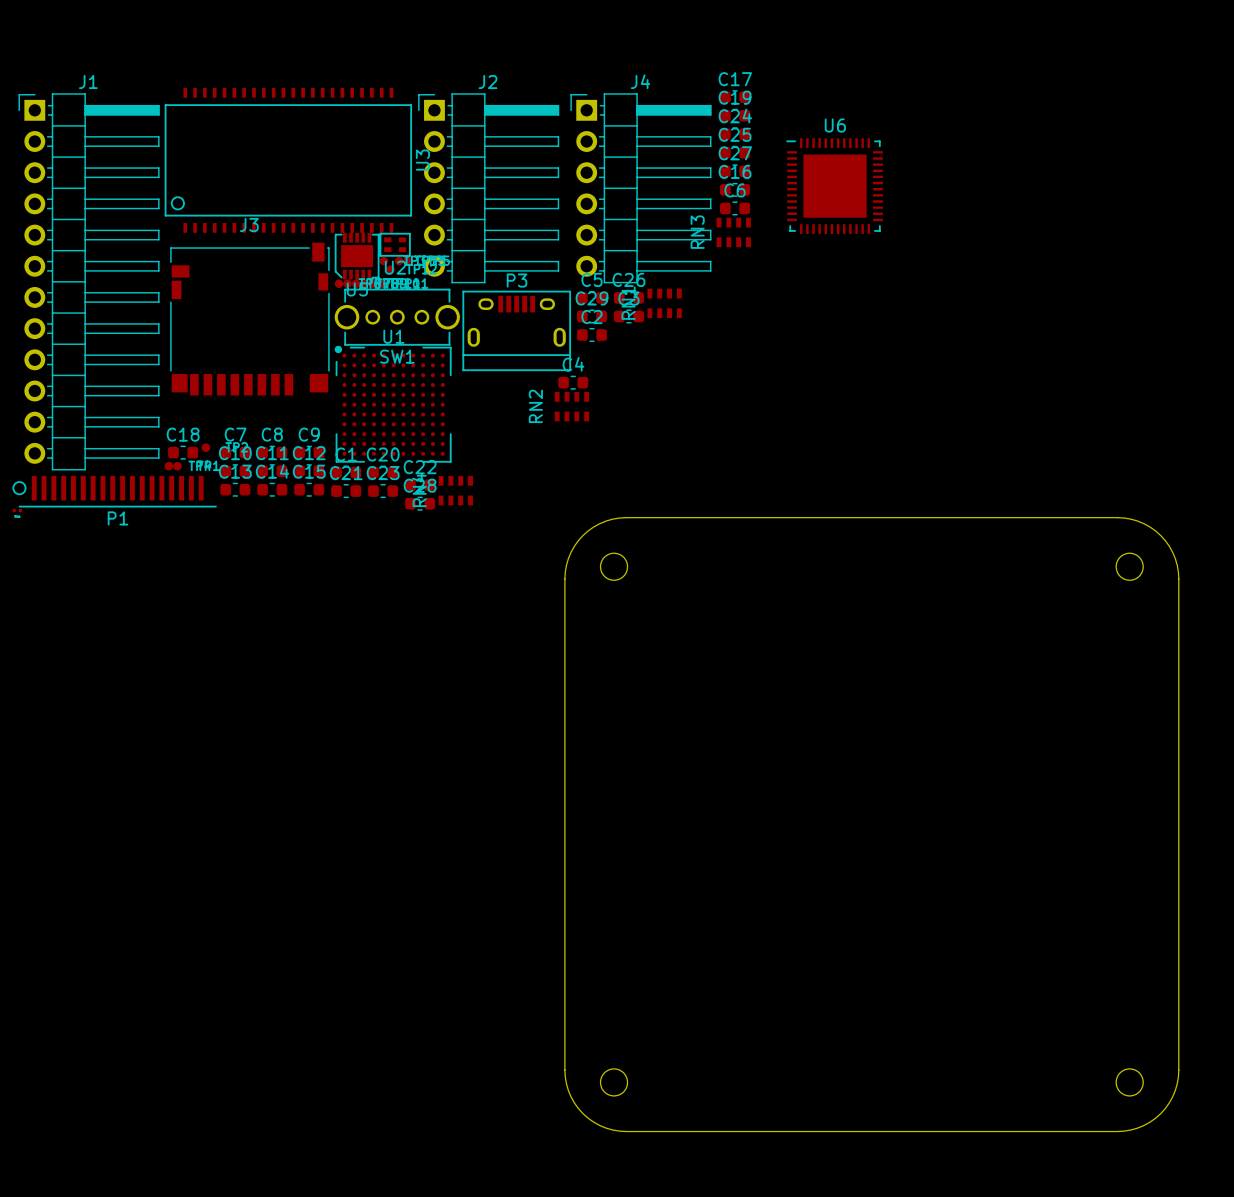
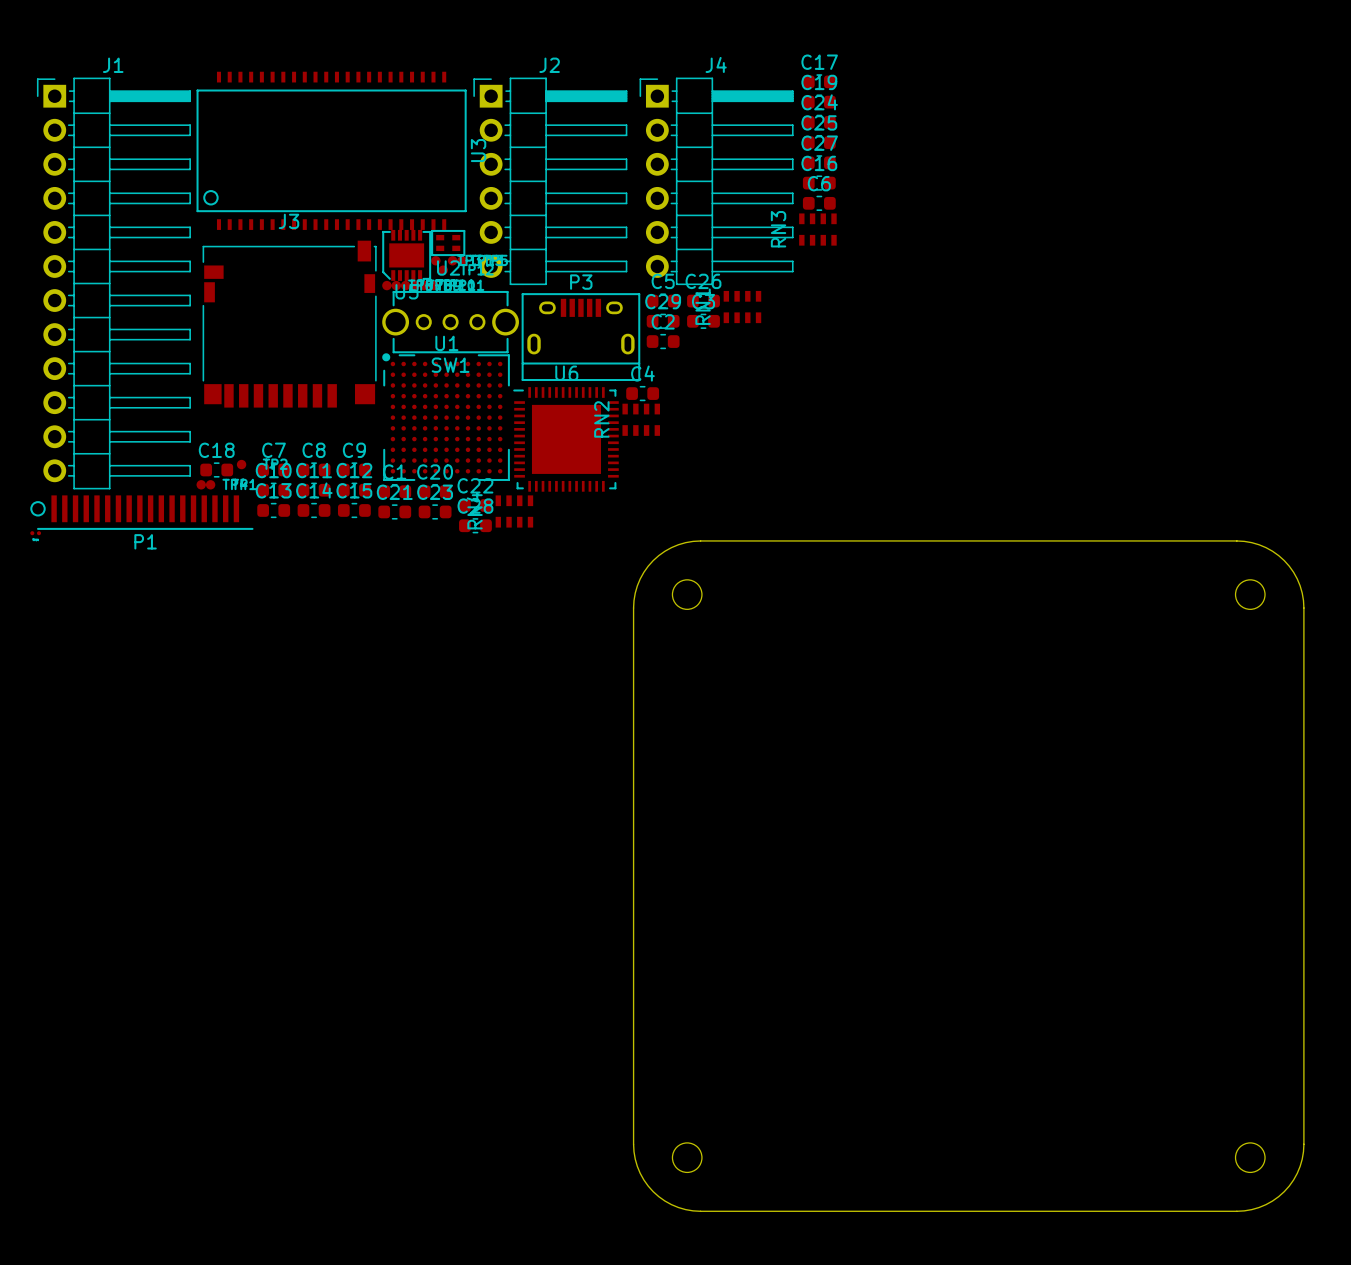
U6 position: (834, 186) -> (565, 439)

